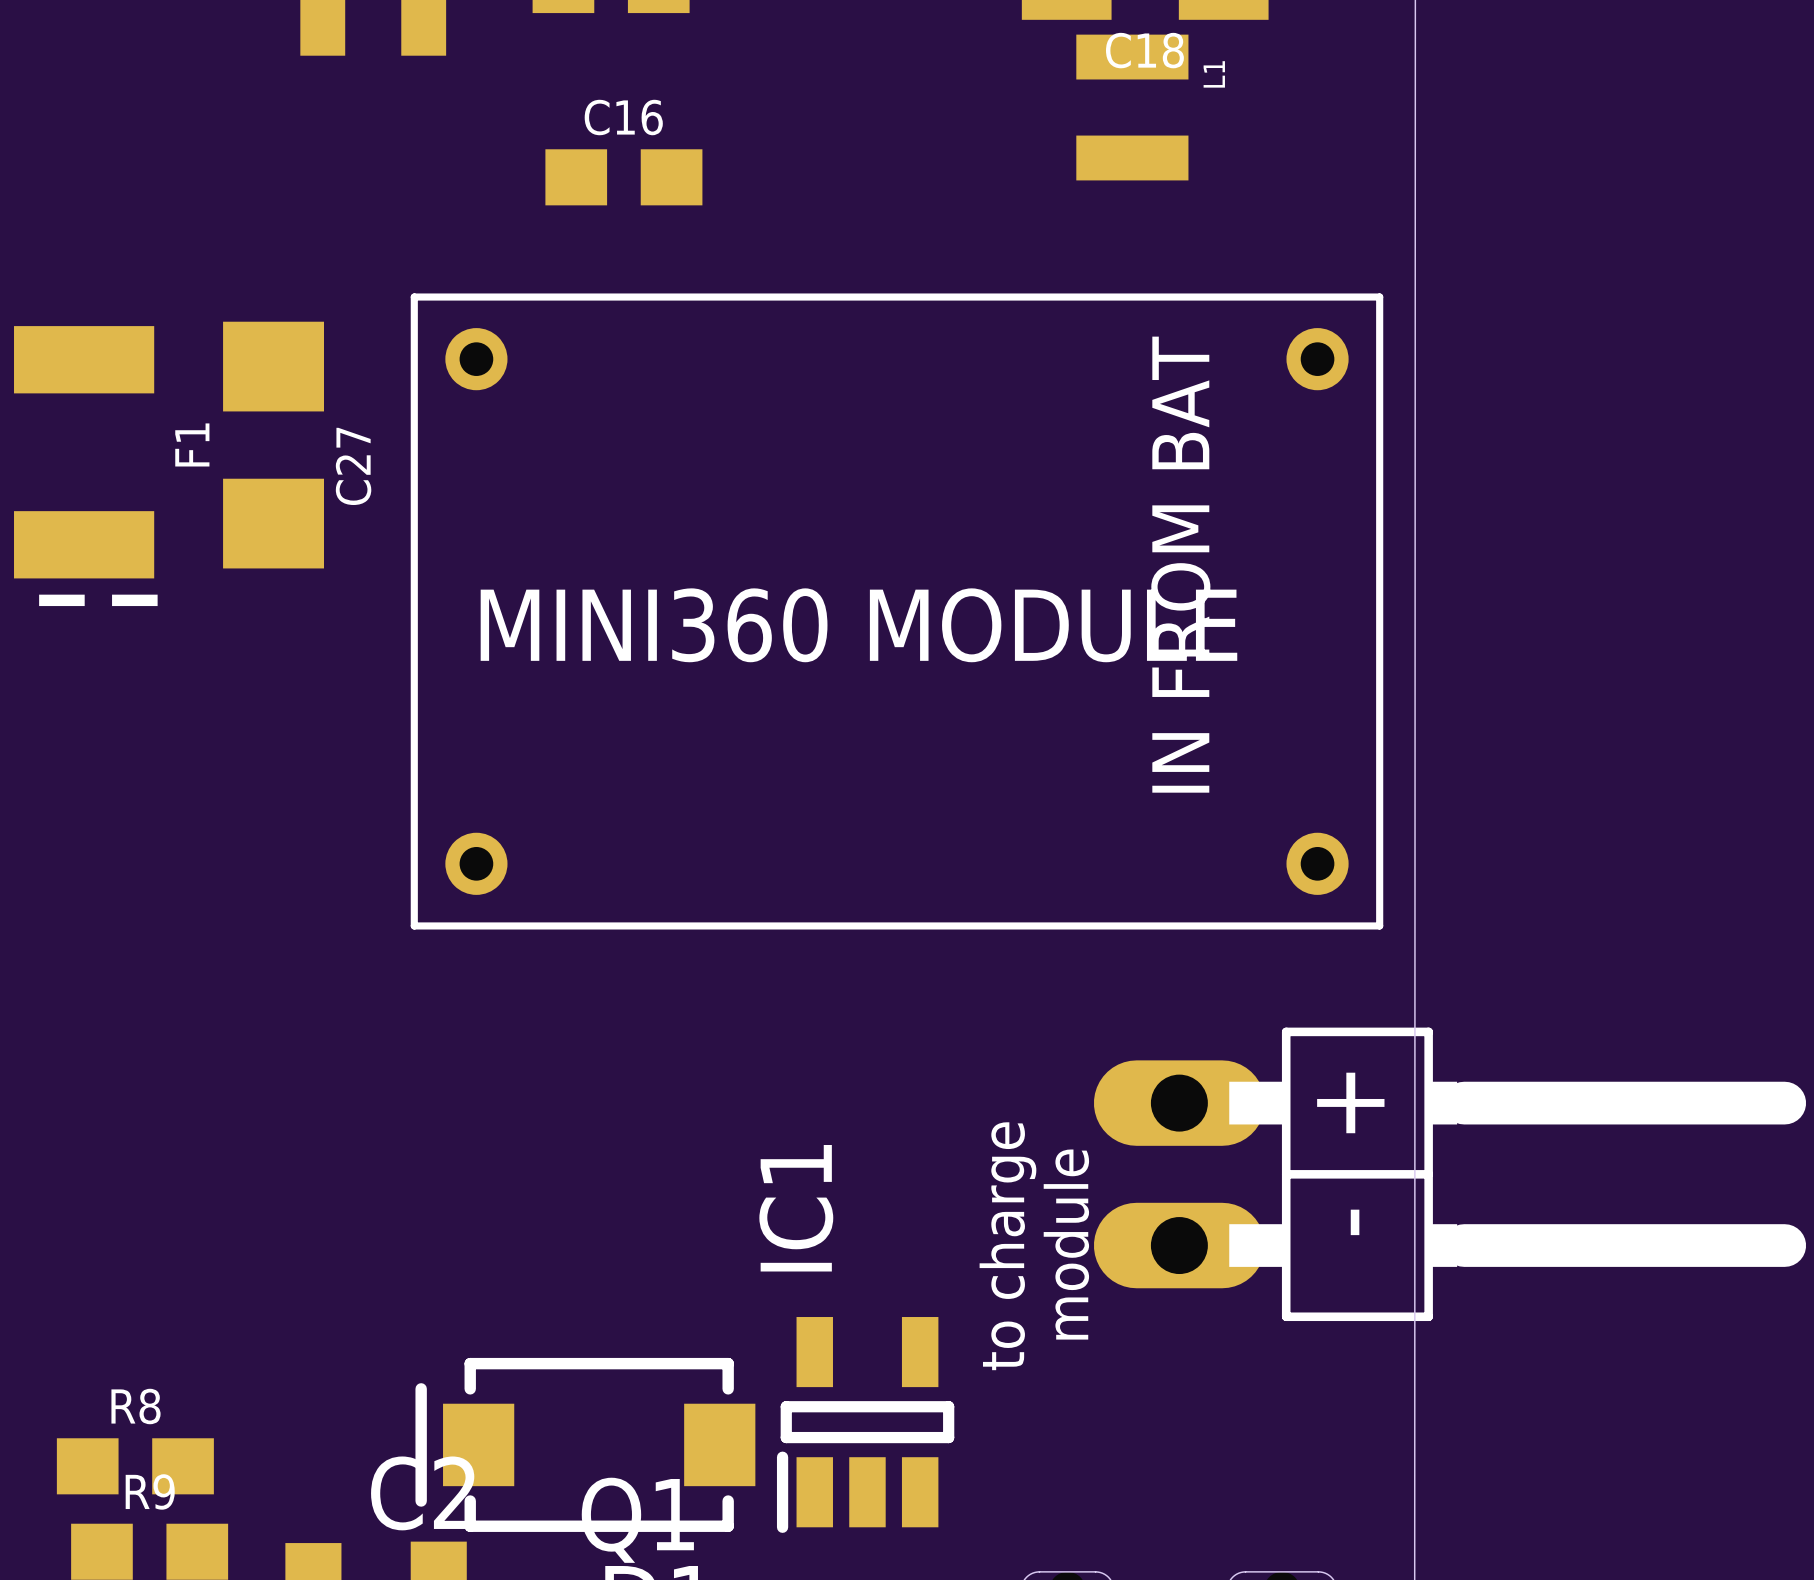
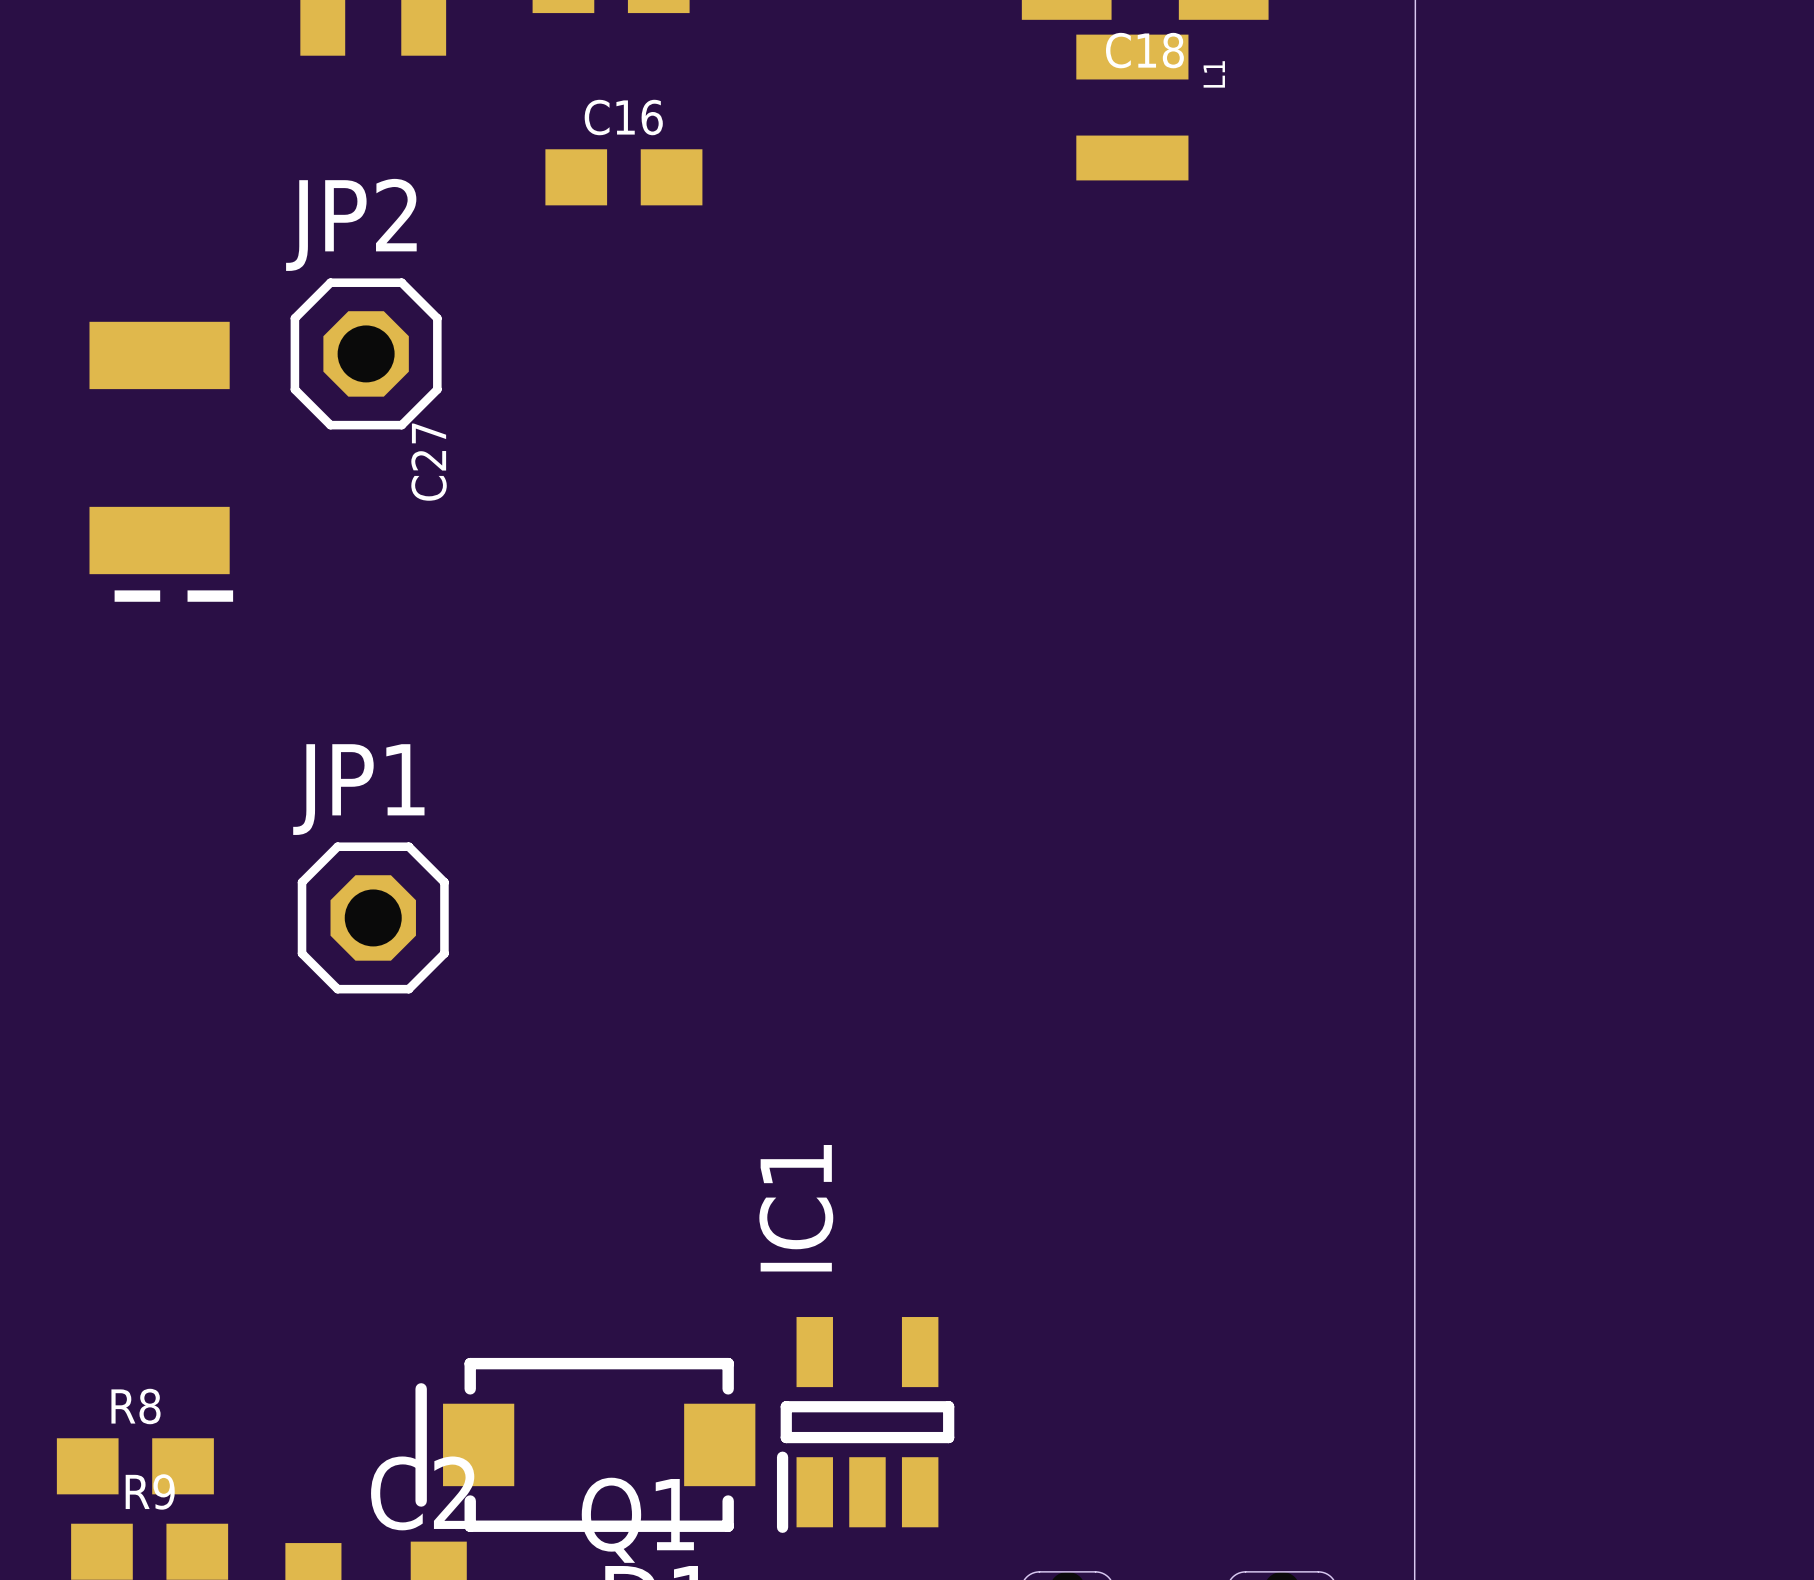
JP2: none -> (366, 353)
F1: (273, 445) -> none
C27 position: (84, 466) -> (160, 461)
text: IN FROM BAT (1180, 564) -> none
part: (896, 611) -> none
JP1: none -> (373, 917)
text: - + (1350, 1153) -> none
part: (1450, 1174) -> none
text: module (1066, 1244) -> none
text: to charge (1007, 1246) -> none

